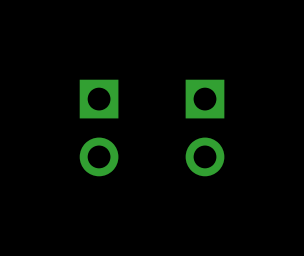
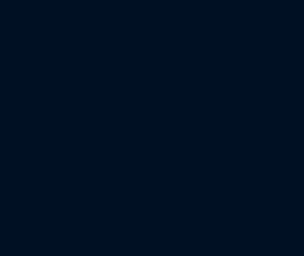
part: (99, 127) -> none
part: (205, 127) -> none

